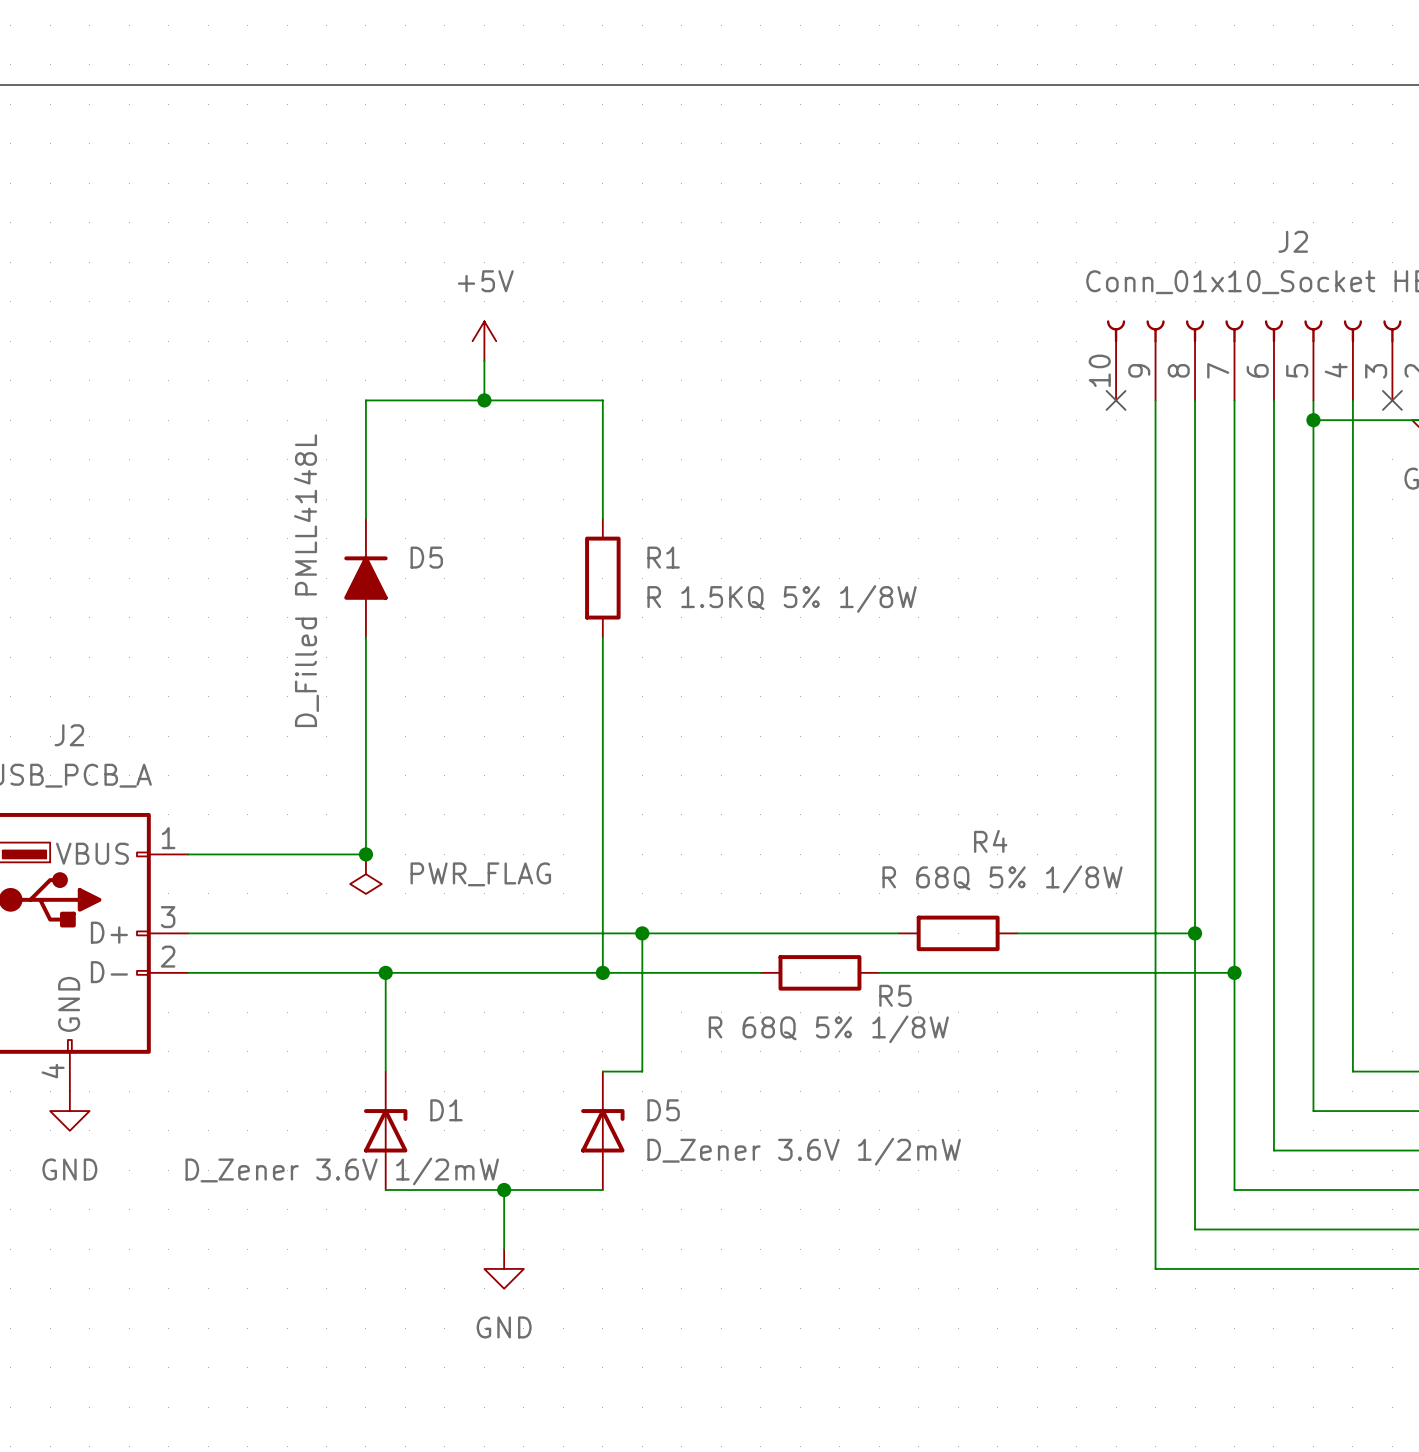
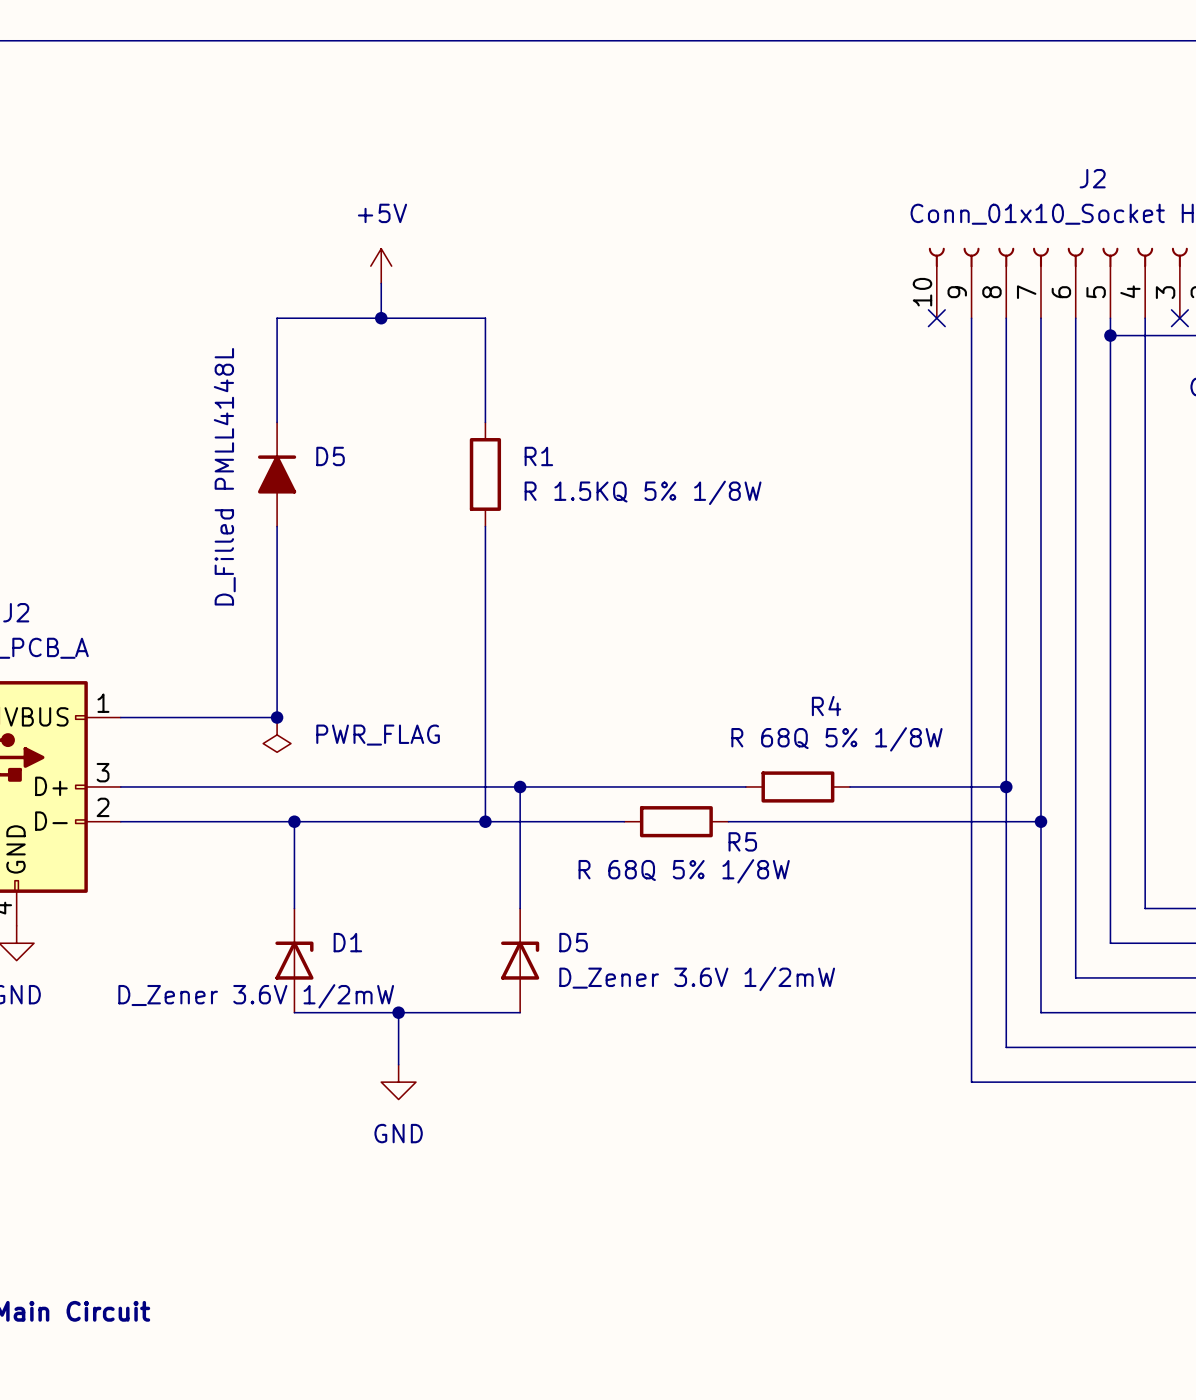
wire: (602, 1071) (642, 1071) -> (485, 1012) (520, 1012)
D5 position: (602, 1130) -> (520, 960)

